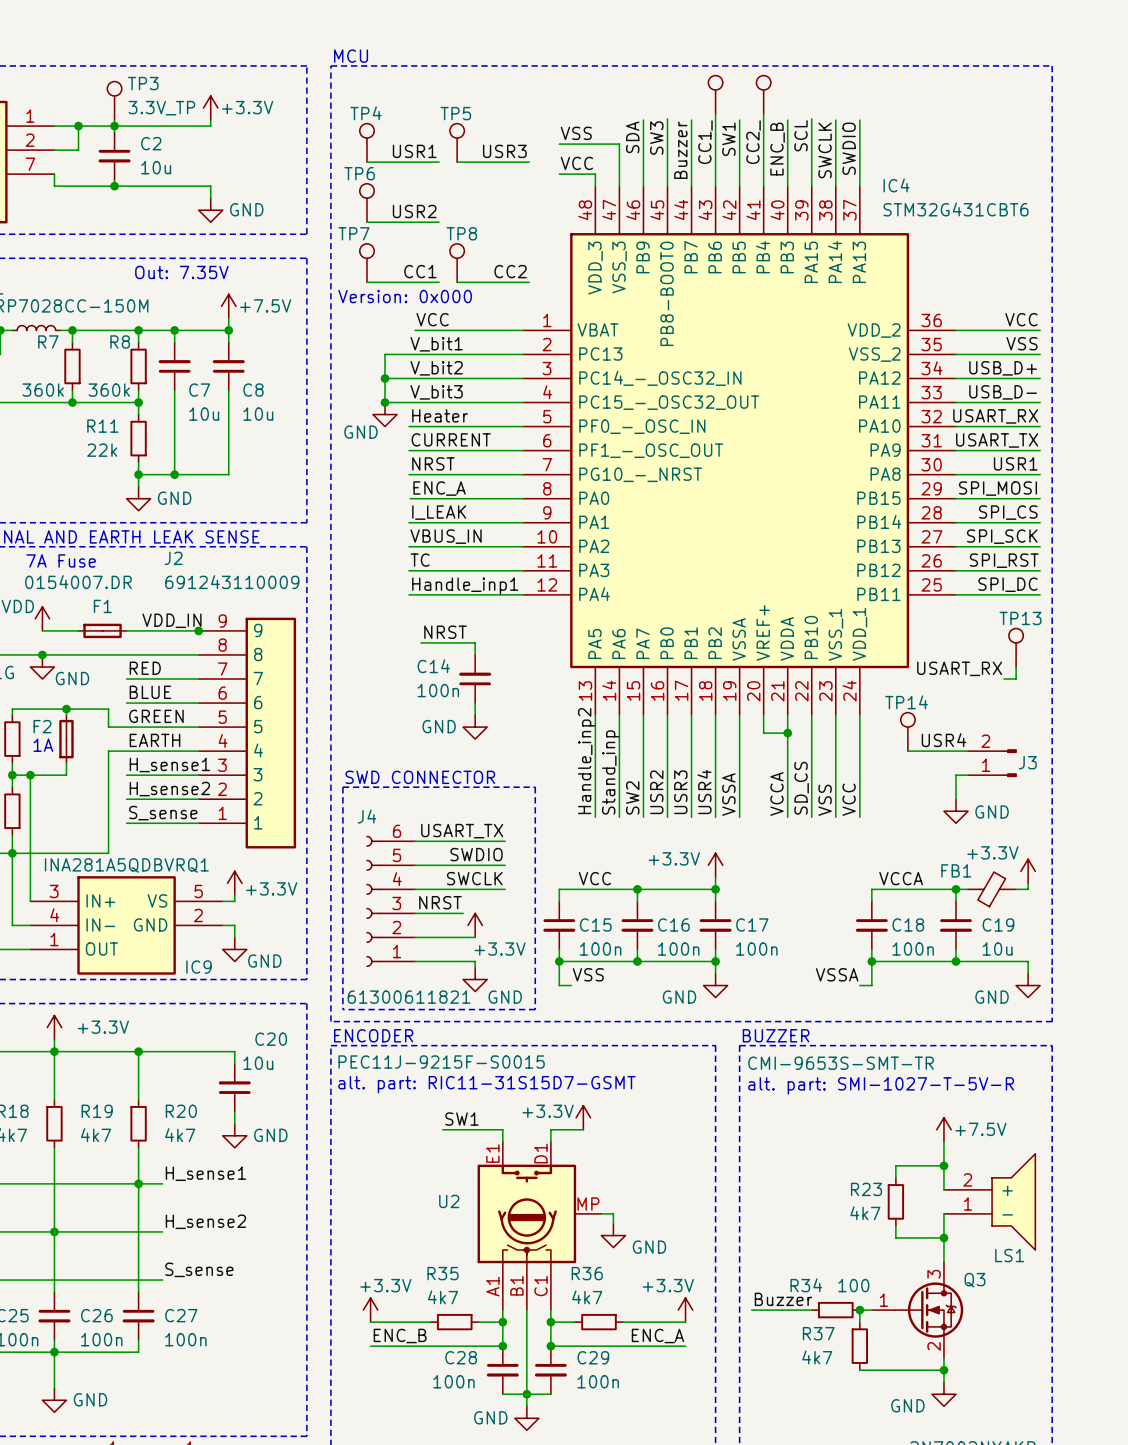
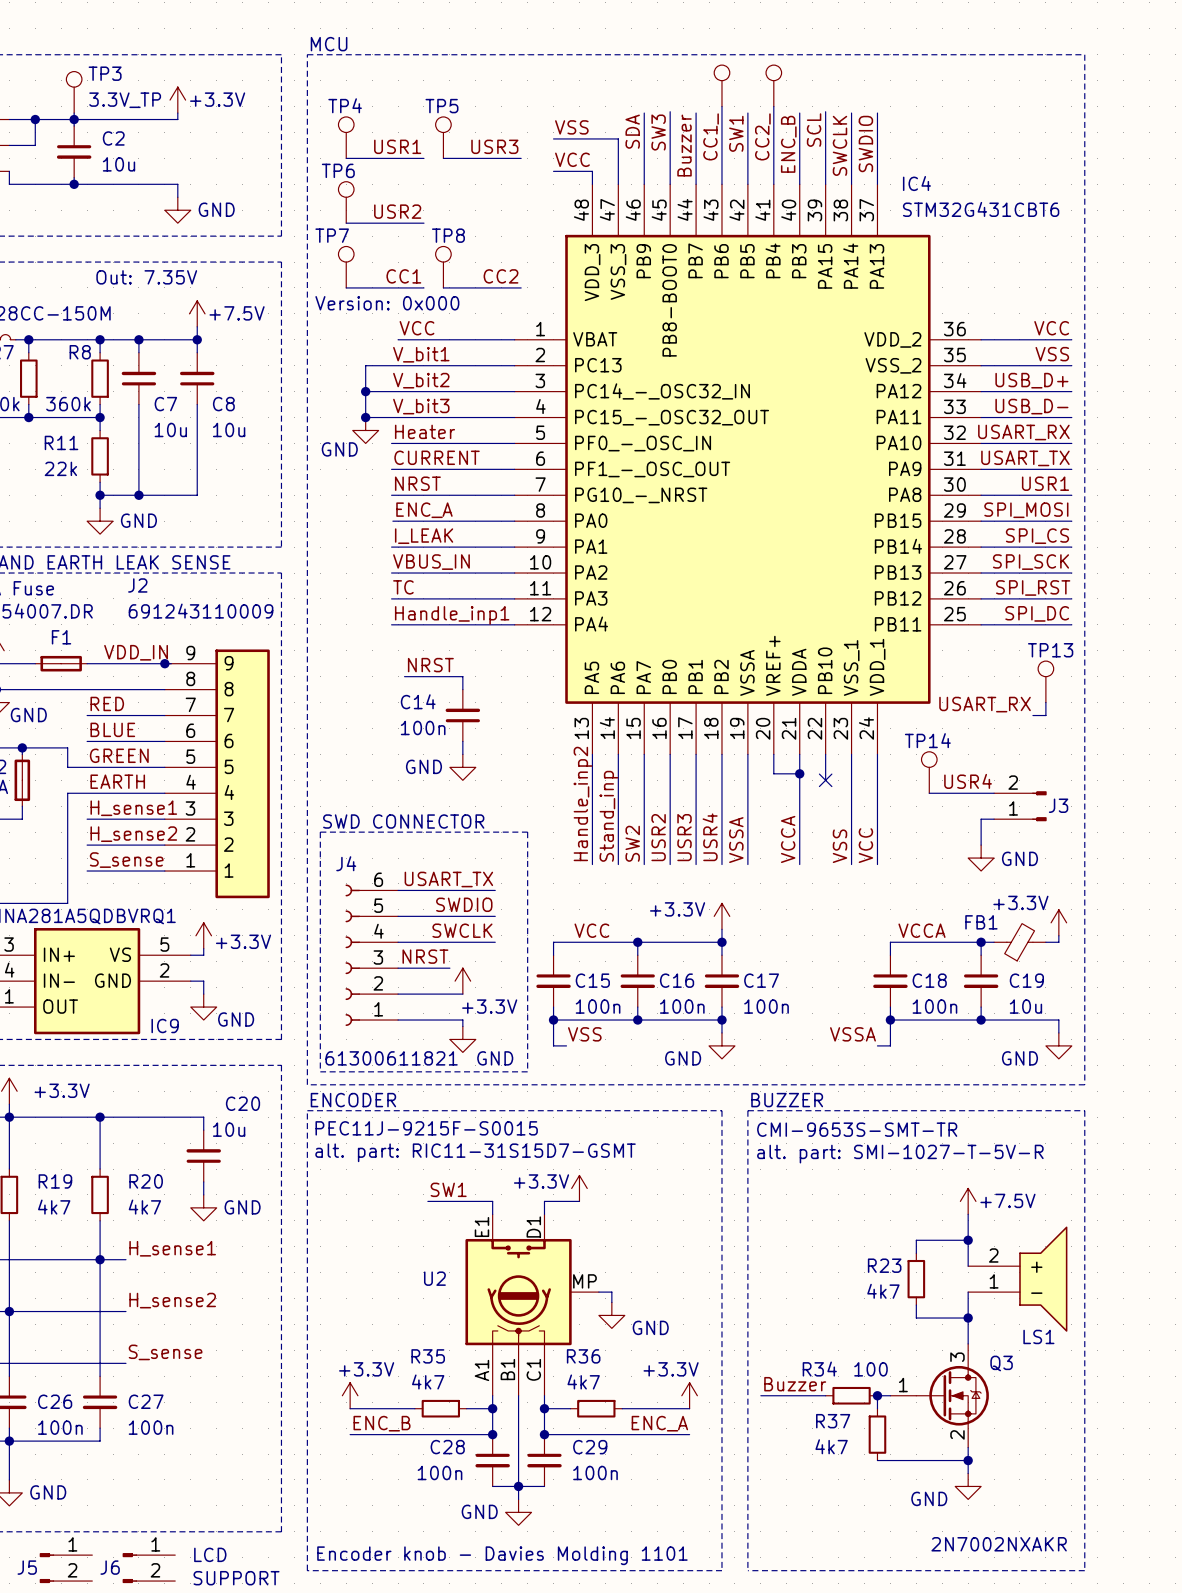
wire: (811, 739) (811, 817) -> none
no-connect mark: none -> (825, 780)
label: SD_CS (801, 788) -> none

